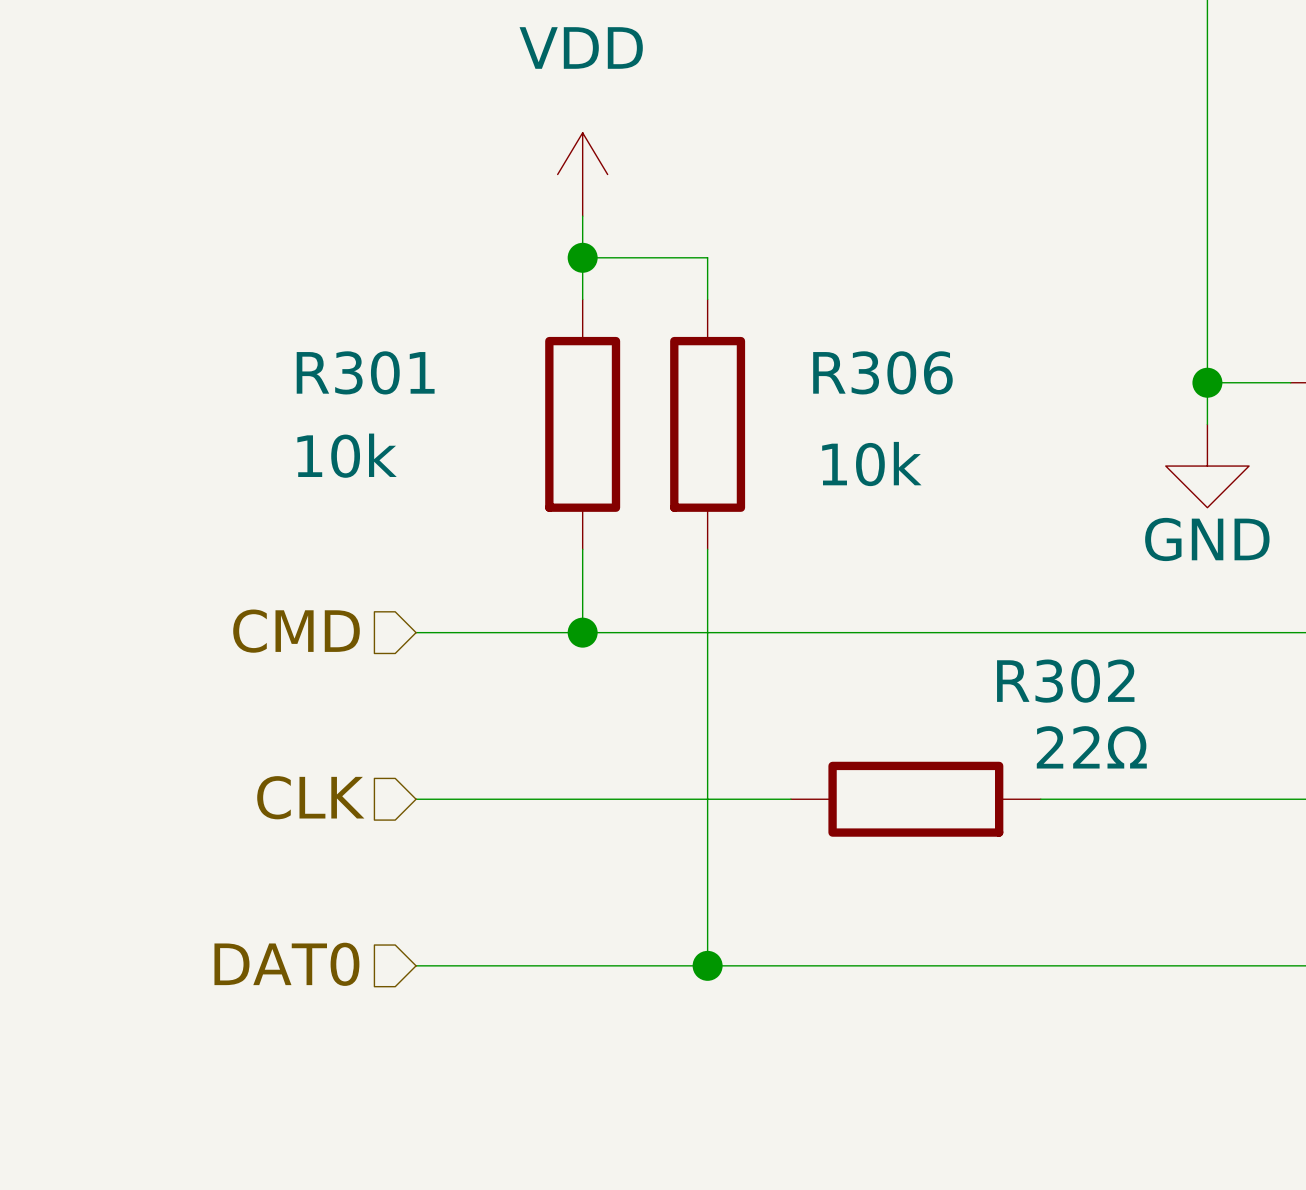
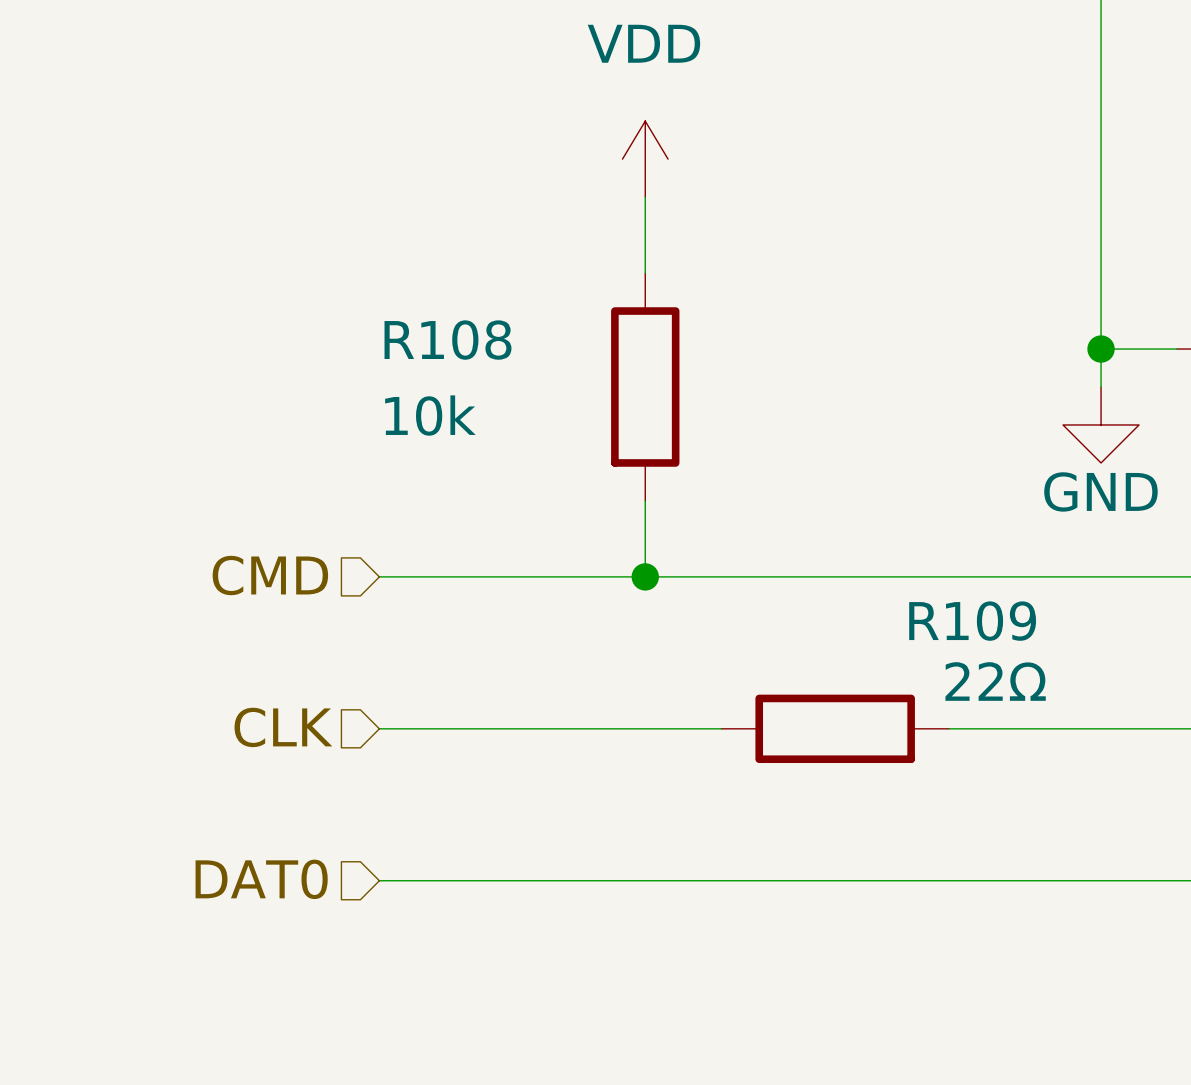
power symbol position: VDD (582, 174) -> VDD (645, 159)
wire: (582, 216) (582, 299) -> none
wire: (582, 257) (707, 257) -> (645, 197) (645, 235)
junction: (582, 257) -> none
R306 name: R306 (882, 372) -> R108 (448, 340)
R301: 10k (582, 424) -> none
R306 value position: 10k (871, 464) -> 10k (430, 415)
wire: (582, 549) (582, 632) -> none
junction position: (582, 632) -> (645, 576)
wire: (707, 632) (707, 965) -> none
R302 name: R302 (1065, 681) -> R109 (972, 621)
junction: (707, 965) -> none

